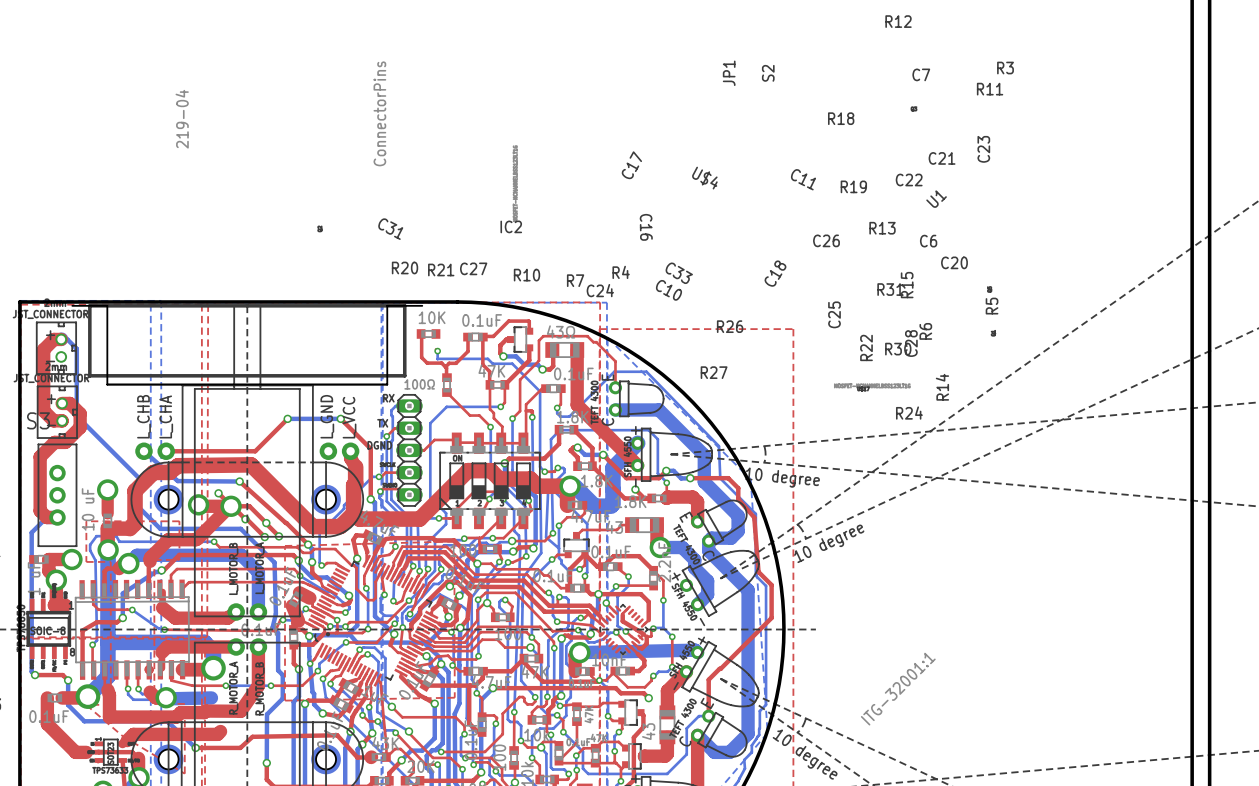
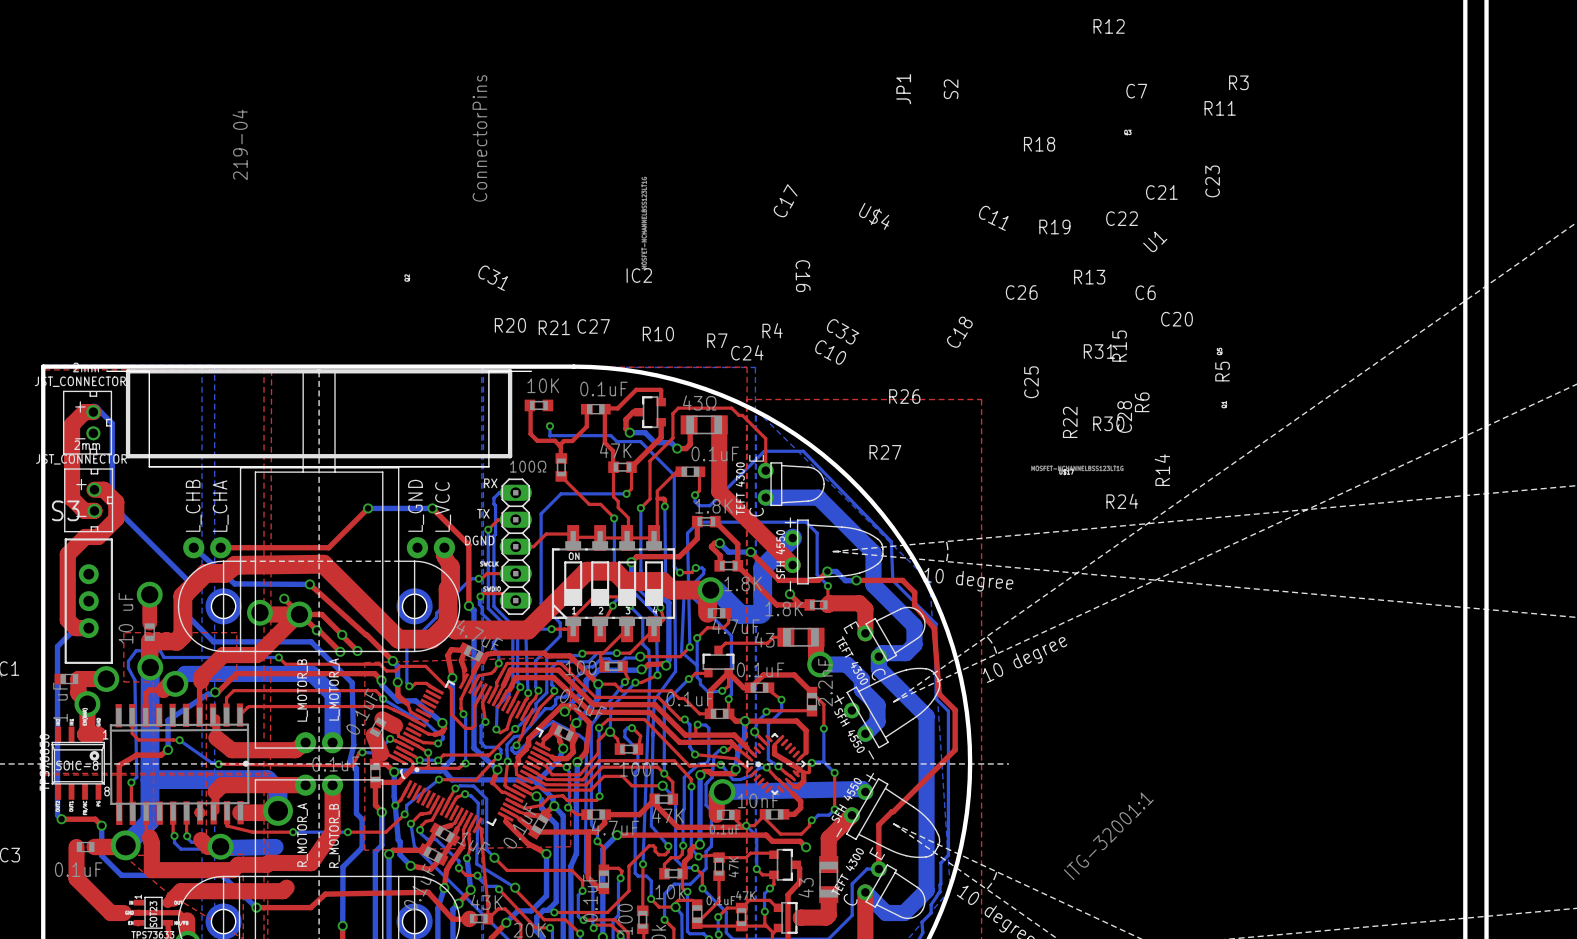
drawing: none -> [89, 751, 100, 761]
drawing: none -> [242, 760, 250, 767]
drawing: none -> [755, 761, 762, 768]

